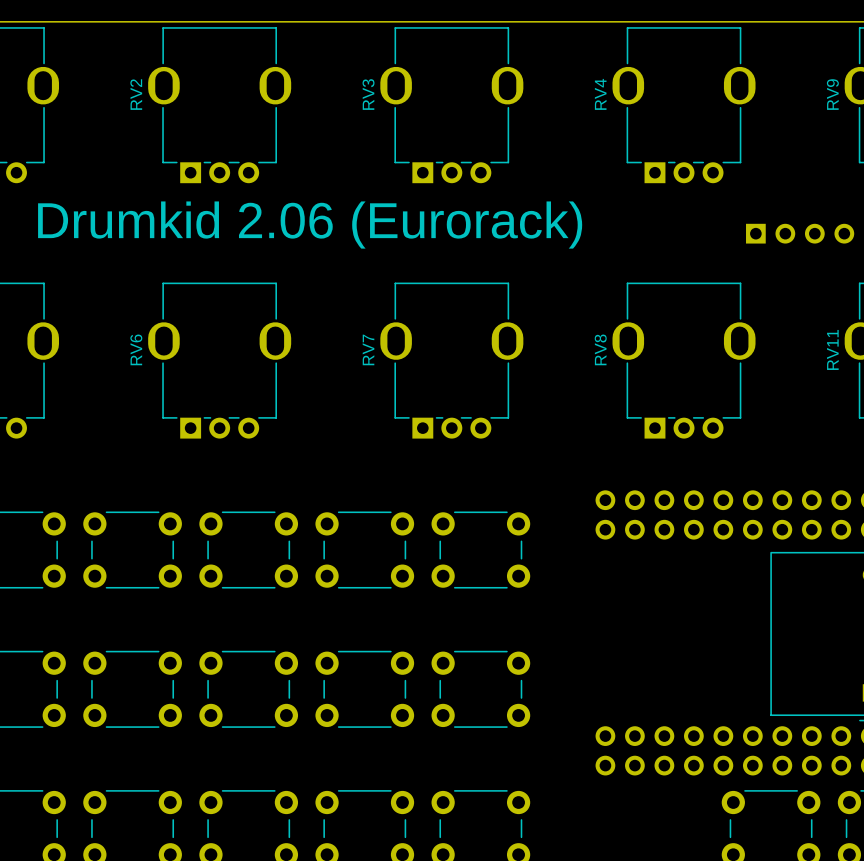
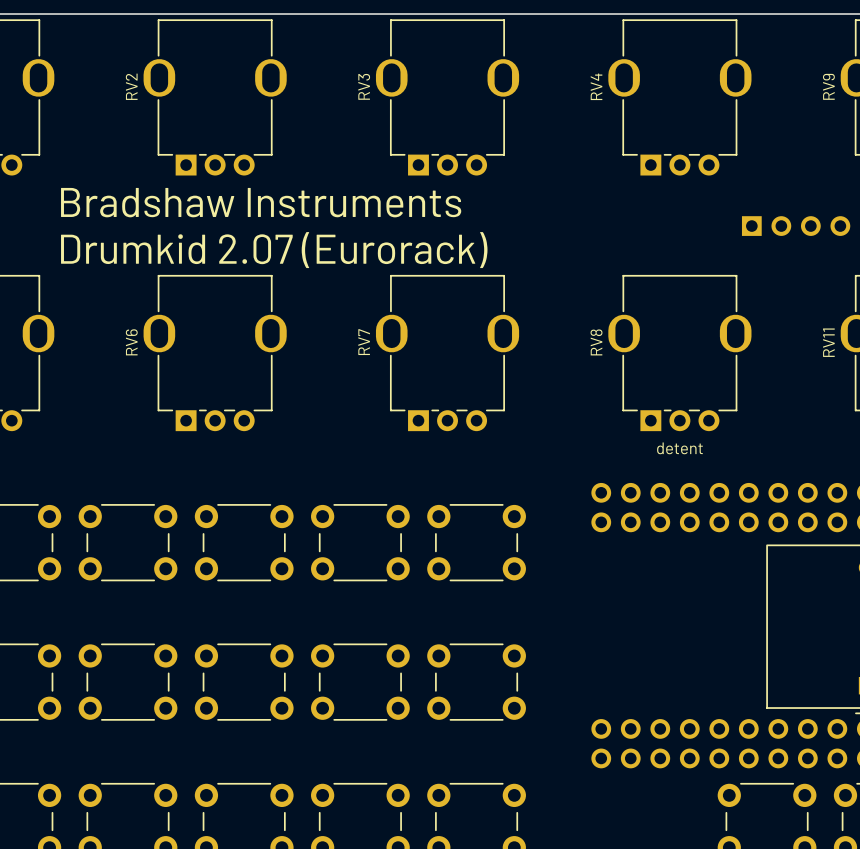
text: none -> Bradshaw Instruments (261, 202)
text: Drumkid 2.06 (Eurorack) (310, 225) -> Drumkid 2.07 (Eurorack) (274, 250)
text: none -> detent (679, 448)

